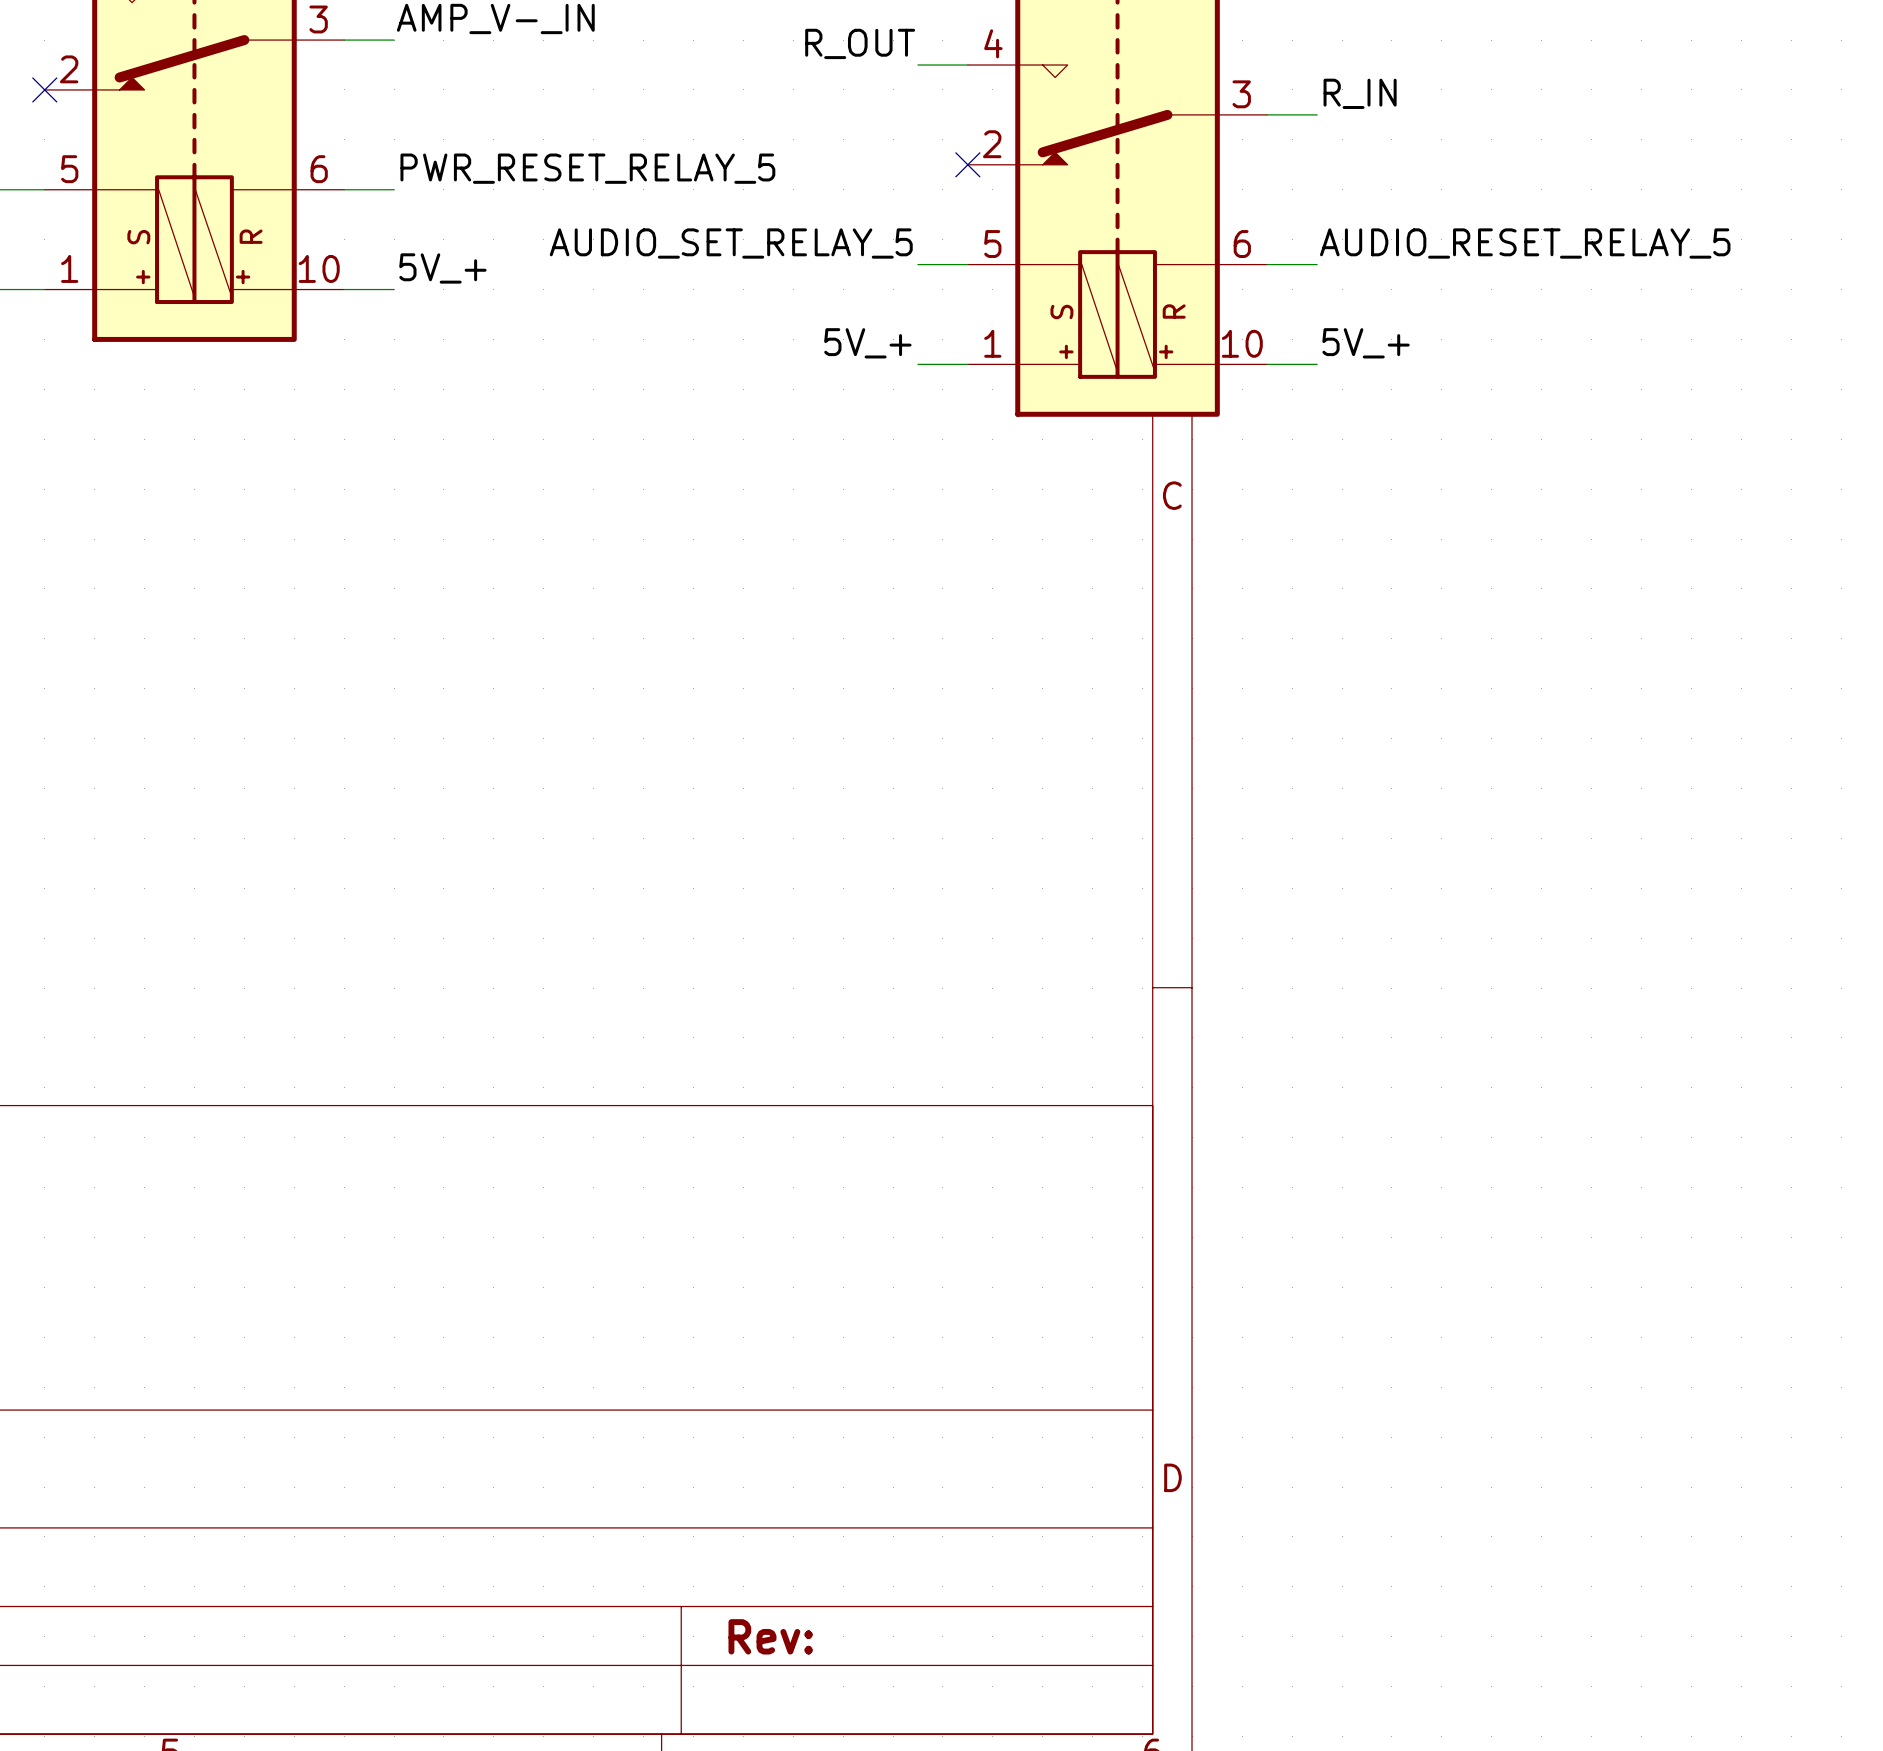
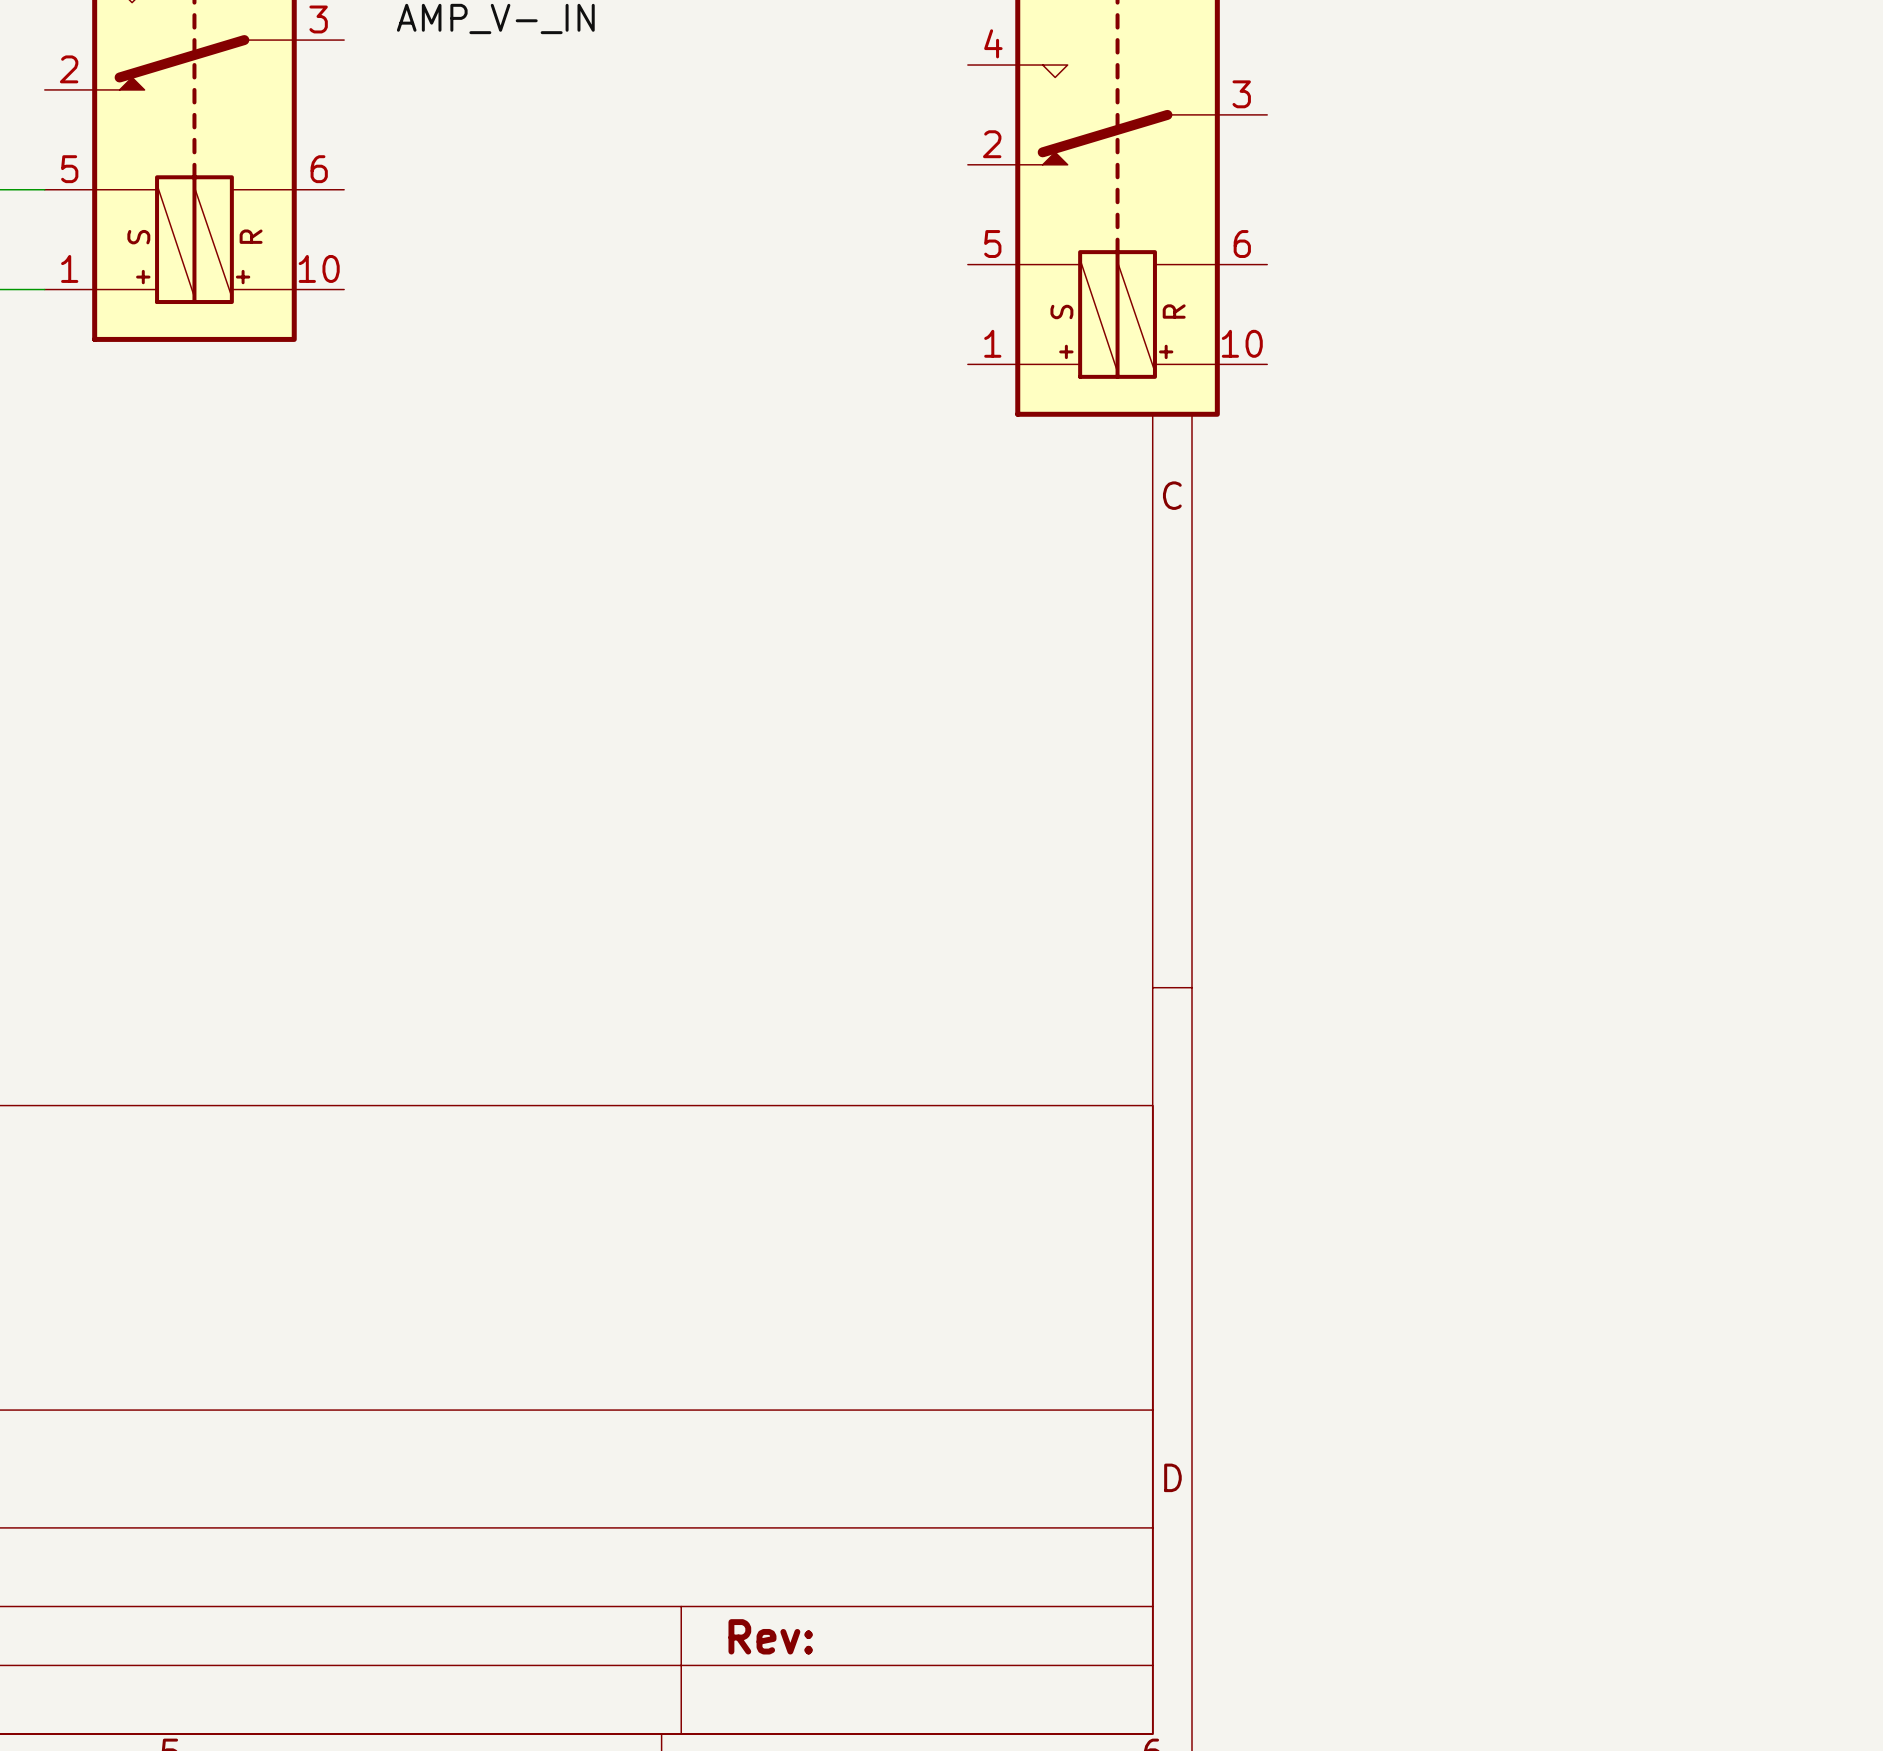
wire: (344, 40) (394, 40) -> none
label: R_OUT (860, 43) -> none
wire: (917, 65) (967, 65) -> none
no-connect mark: (44, 89) -> none
label: R_IN (1360, 93) -> none
wire: (1267, 114) (1317, 114) -> none
no-connect mark: (967, 164) -> none
label: PWR_RESET_RELAY_5 (587, 168) -> none
wire: (344, 189) (394, 189) -> none
label: AUDIO_SET_RELAY_5 (731, 243) -> none
label: AUDIO_RESET_RELAY_5 (1525, 243) -> none
wire: (917, 264) (967, 264) -> none
wire: (1267, 264) (1317, 264) -> none
label: 5V_+ (442, 268) -> none
wire: (344, 289) (394, 289) -> none
label: 5V_+ (867, 343) -> none
label: 5V_+ (1366, 343) -> none
wire: (917, 364) (967, 364) -> none
wire: (1267, 364) (1317, 364) -> none

